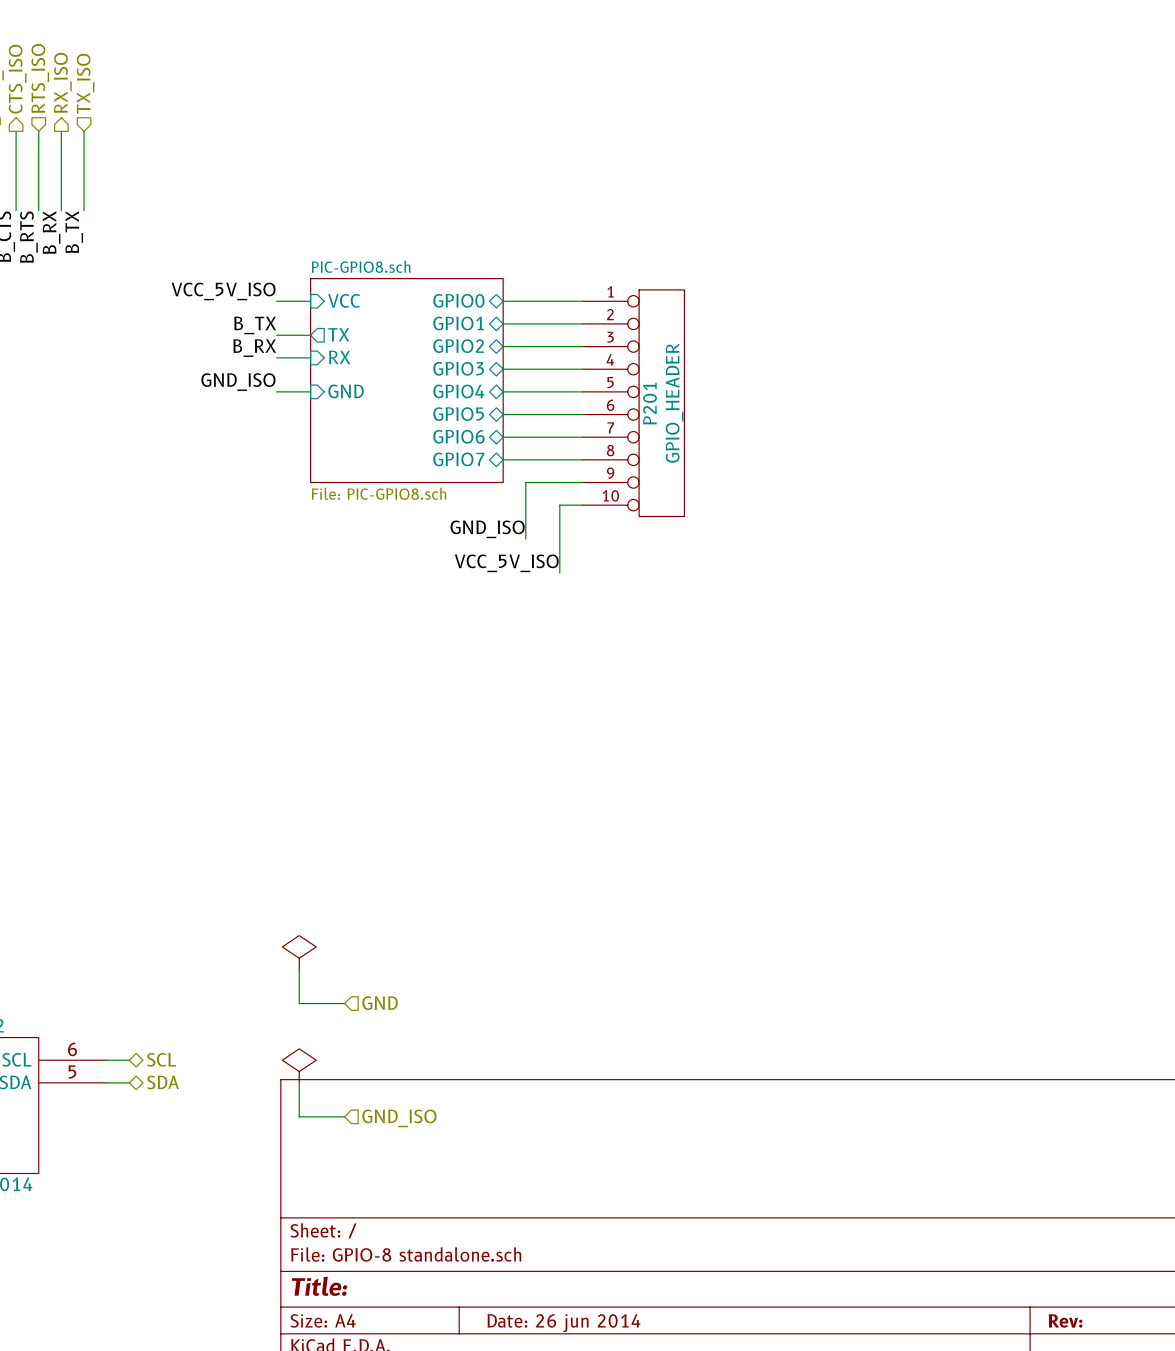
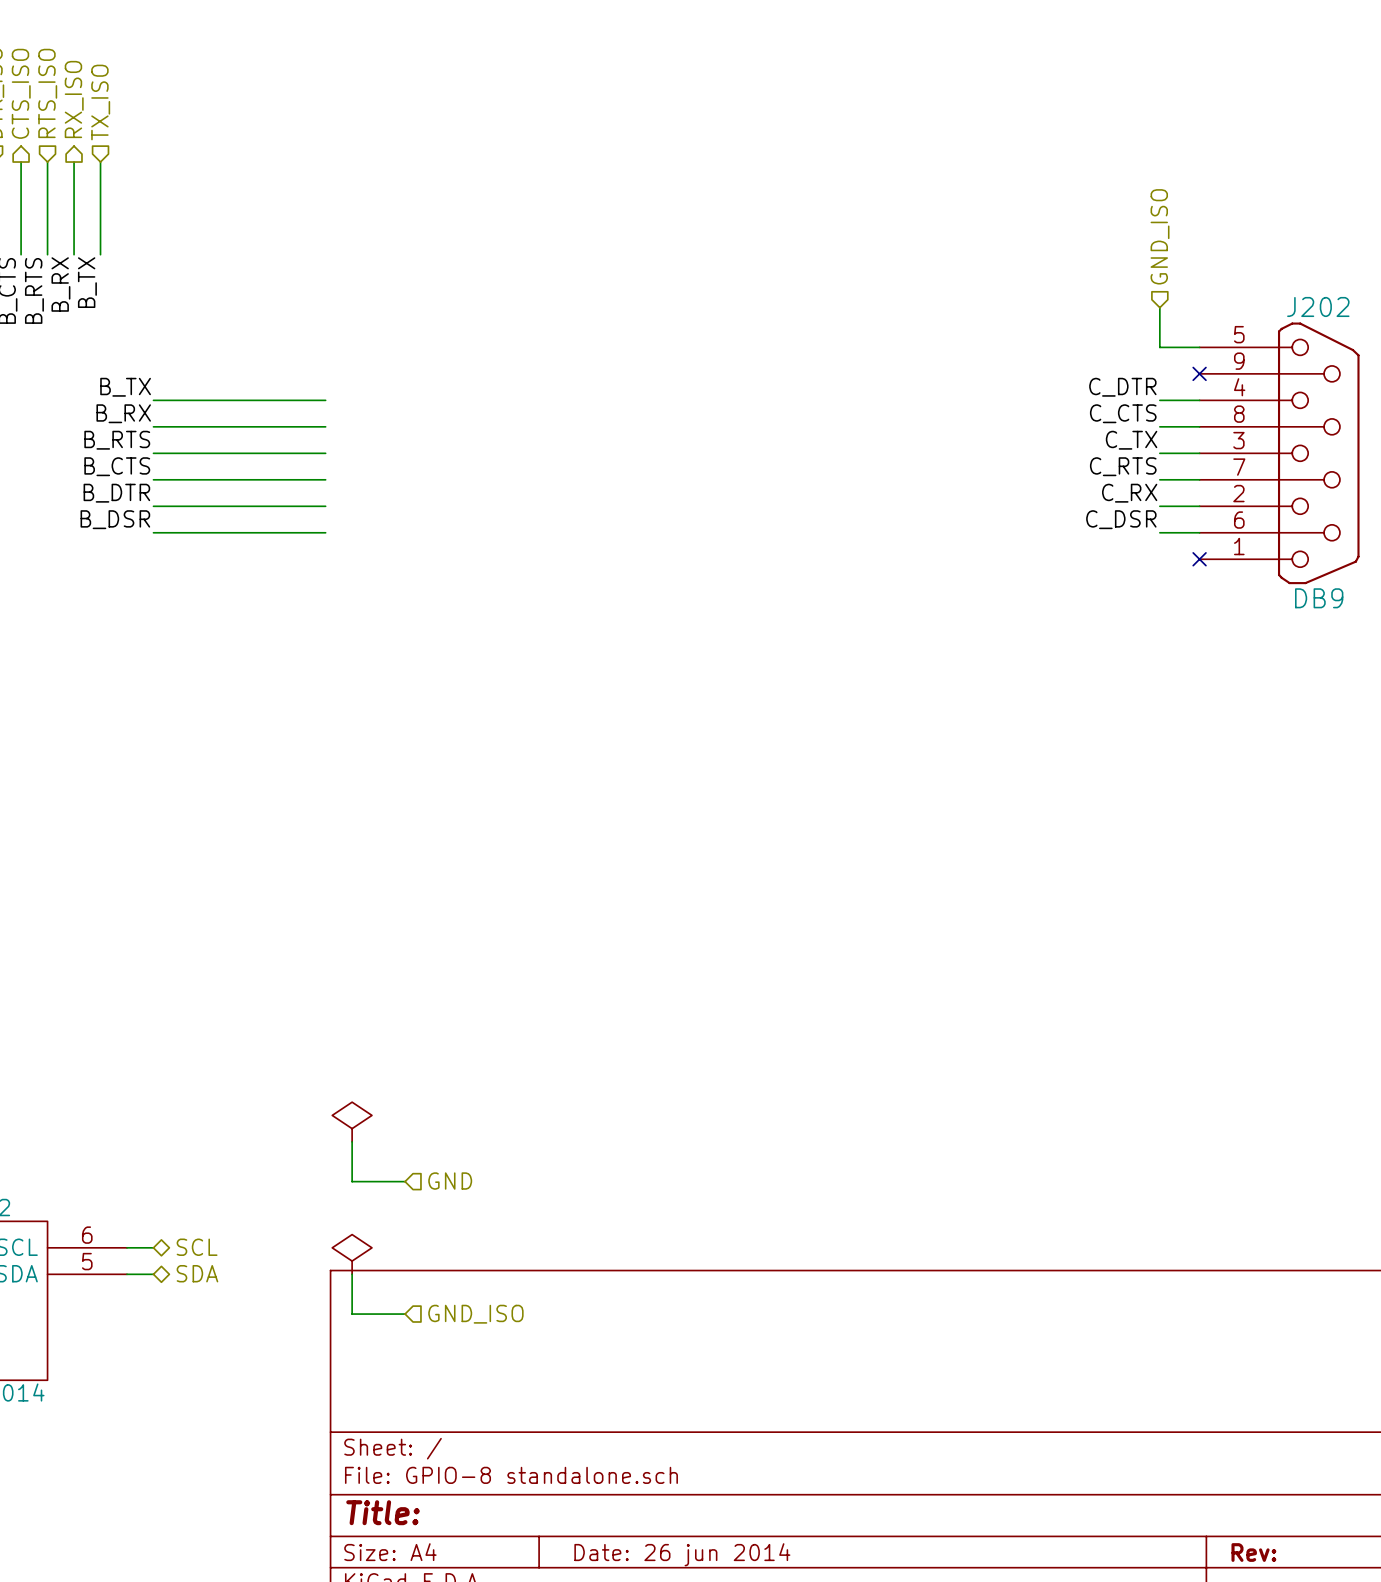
hierarchical label: none -> GND_ISO (1160, 236)
wire: none -> (1159, 307) (1159, 347) (1199, 347)
label: VCC_5V_ISO (223, 291) -> none
sheet pin: VCC (344, 300) -> none
sheet pin: GPIO0 (458, 300) -> none
wire: (276, 301) (310, 301) -> none
wire: (503, 301) (582, 301) -> none
no-connect mark: none -> (1199, 373)
sheet pin: GPIO1 (458, 323) -> none
wire: (503, 323) (582, 323) -> none
label position: B_TX (255, 325) -> B_TX (125, 387)
label: none -> C_DTR (1122, 387)
sheet pin: TX (338, 334) -> none
wire: (276, 335) (310, 335) -> (325, 400) (153, 400)
wire: none -> (1159, 400) (1199, 400)
sheet pin: GPIO2 (458, 346) -> none
wire: (503, 346) (582, 346) -> none
label position: B_RX (254, 348) -> B_RX (123, 413)
label: none -> C_CTS (1123, 413)
wire: (276, 357) (310, 357) -> (325, 426) (153, 426)
sheet pin: RX (339, 357) -> none
wire: none -> (1159, 426) (1199, 426)
sheet pin: GPIO3 (458, 368) -> none
wire: (503, 369) (582, 369) -> none
label: none -> B_RTS (117, 440)
label: none -> C_TX (1131, 440)
wire: none -> (153, 453) (325, 453)
sheet PIC-GPIO8.sch: File: PIC-GPIO8.sch (406, 380) -> none
wire: none -> (1159, 453) (1199, 453)
J202: none -> DB9 (1279, 453)
label: GND_ISO (238, 382) -> none
wire: (276, 391) (310, 391) -> none
sheet pin: GND (346, 391) -> none
sheet pin: GPIO4 (458, 391) -> none
wire: (503, 391) (582, 391) -> none
label: none -> B_CTS (117, 466)
label: none -> C_RTS (1123, 466)
wire: none -> (153, 479) (325, 479)
P201: GPIO_HEADER (633, 403) -> none
wire: none -> (1159, 479) (1199, 479)
sheet pin: GPIO5 (458, 414) -> none
wire: (503, 414) (582, 414) -> none
label: none -> B_DTR (116, 493)
label: none -> C_RX (1129, 493)
wire: none -> (153, 506) (325, 506)
wire: none -> (1159, 506) (1199, 506)
sheet pin: GPIO6 (458, 436) -> none
wire: (503, 437) (582, 437) -> none
label: none -> B_DSR (115, 519)
label: none -> C_DSR (1121, 519)
wire: none -> (153, 532) (325, 532)
wire: none -> (1159, 532) (1199, 532)
sheet pin: GPIO7 (458, 459) -> none
wire: (503, 459) (582, 459) -> none
no-connect mark: none -> (1199, 559)
wire: (582, 482) (525, 482) (525, 539) -> none
wire: (582, 505) (559, 505) (559, 573) -> none
label: GND_ISO (487, 529) -> none
label: VCC_5V_ISO (506, 563) -> none

